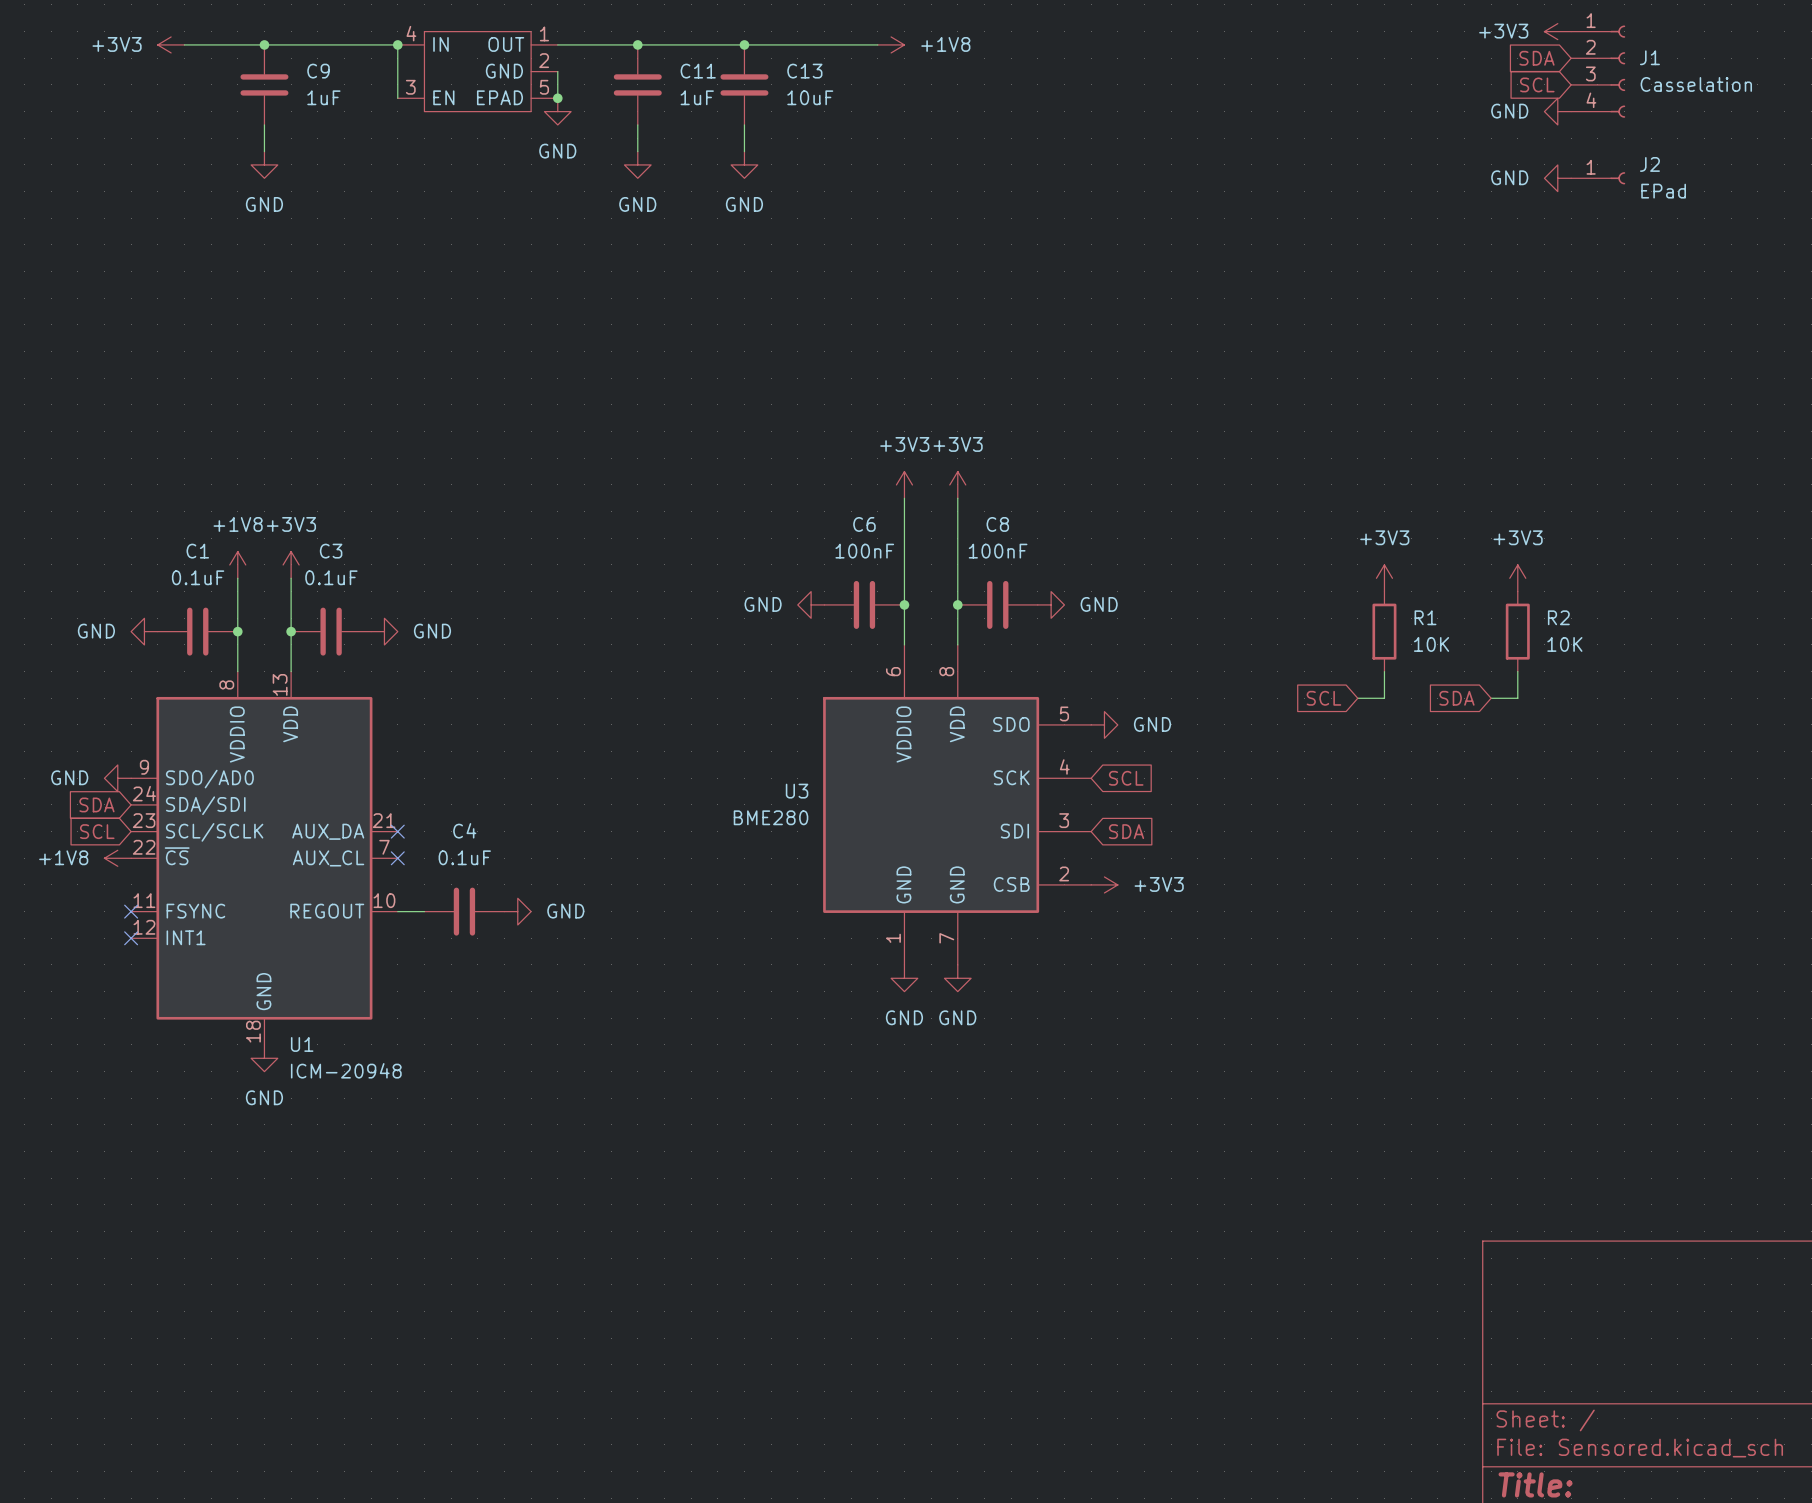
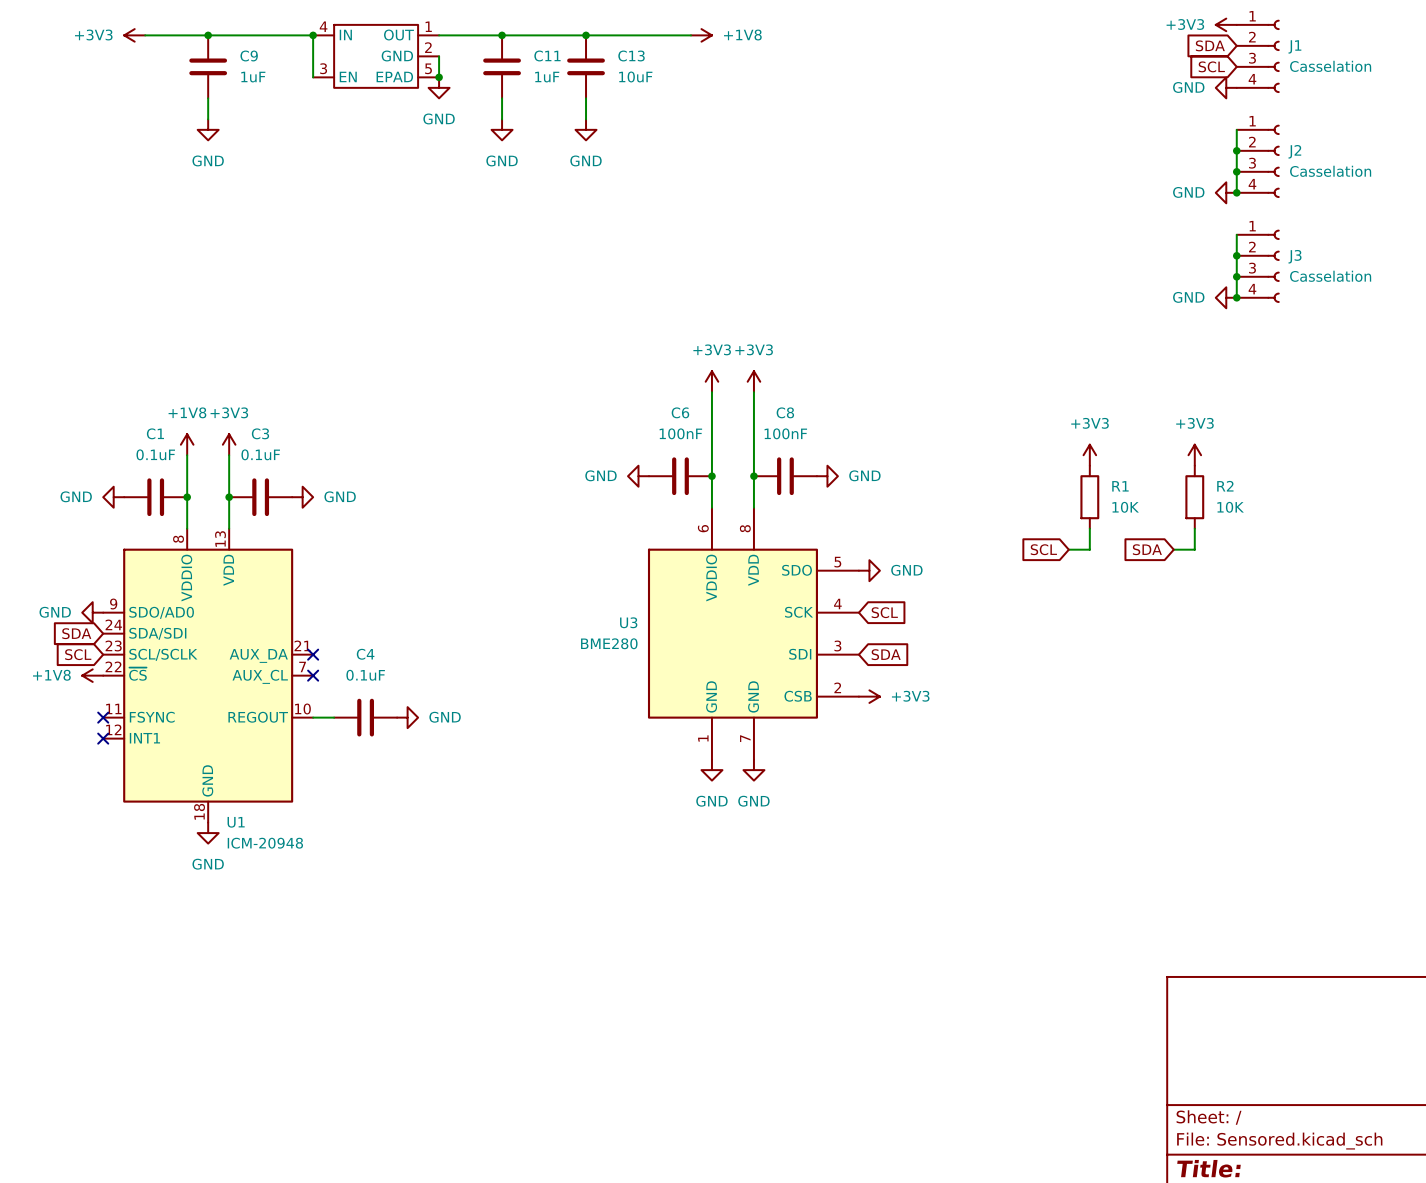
wire: none -> (1236, 129) (1236, 192)
J2 symbol: [1571, 172, 1626, 185] -> [1236, 125, 1280, 198]
power symbol position: GND (1557, 178) -> GND (1226, 192)
junction: none -> (1236, 150)
J2 value: EPad (1663, 191) -> Casselation (1330, 171)
junction: none -> (1236, 171)
junction: none -> (1236, 192)
wire: none -> (1236, 234) (1236, 297)
junction: none -> (1236, 255)
J3: none -> Casselation (1258, 266)
junction: none -> (1236, 276)
power symbol: none -> GND (1226, 297)
junction: none -> (1236, 297)

